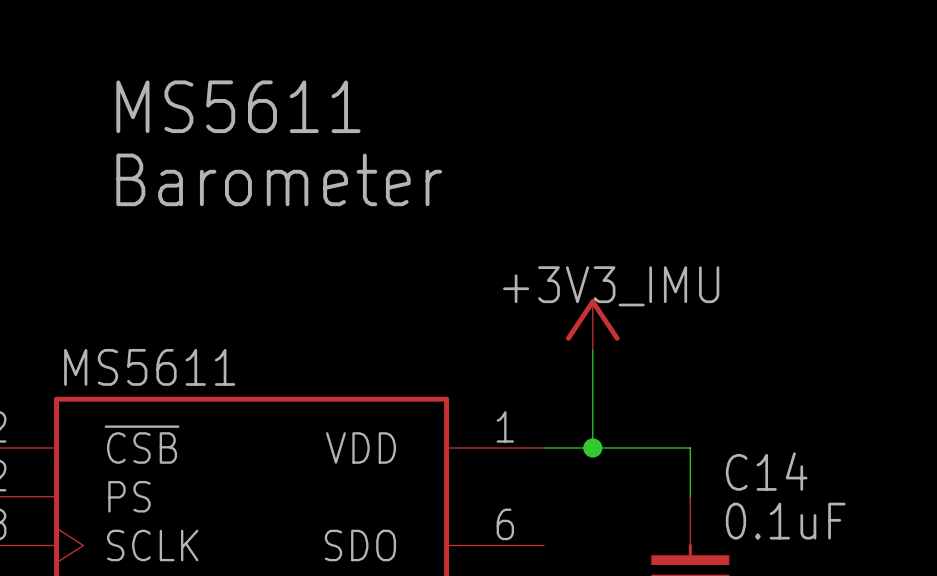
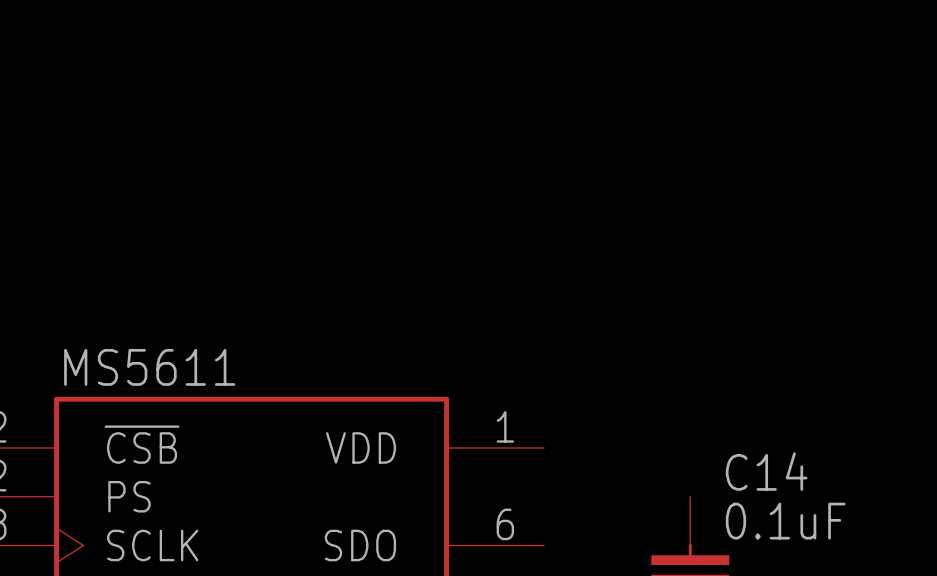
text: MS5611 (238, 106) -> none
text: Barometer (279, 179) -> none
power symbol: +3V3_IMU (592, 324) -> none
wire: (592, 350) (592, 447) -> none
wire: (544, 447) (690, 447) (690, 496) -> none
junction: (592, 447) -> none

